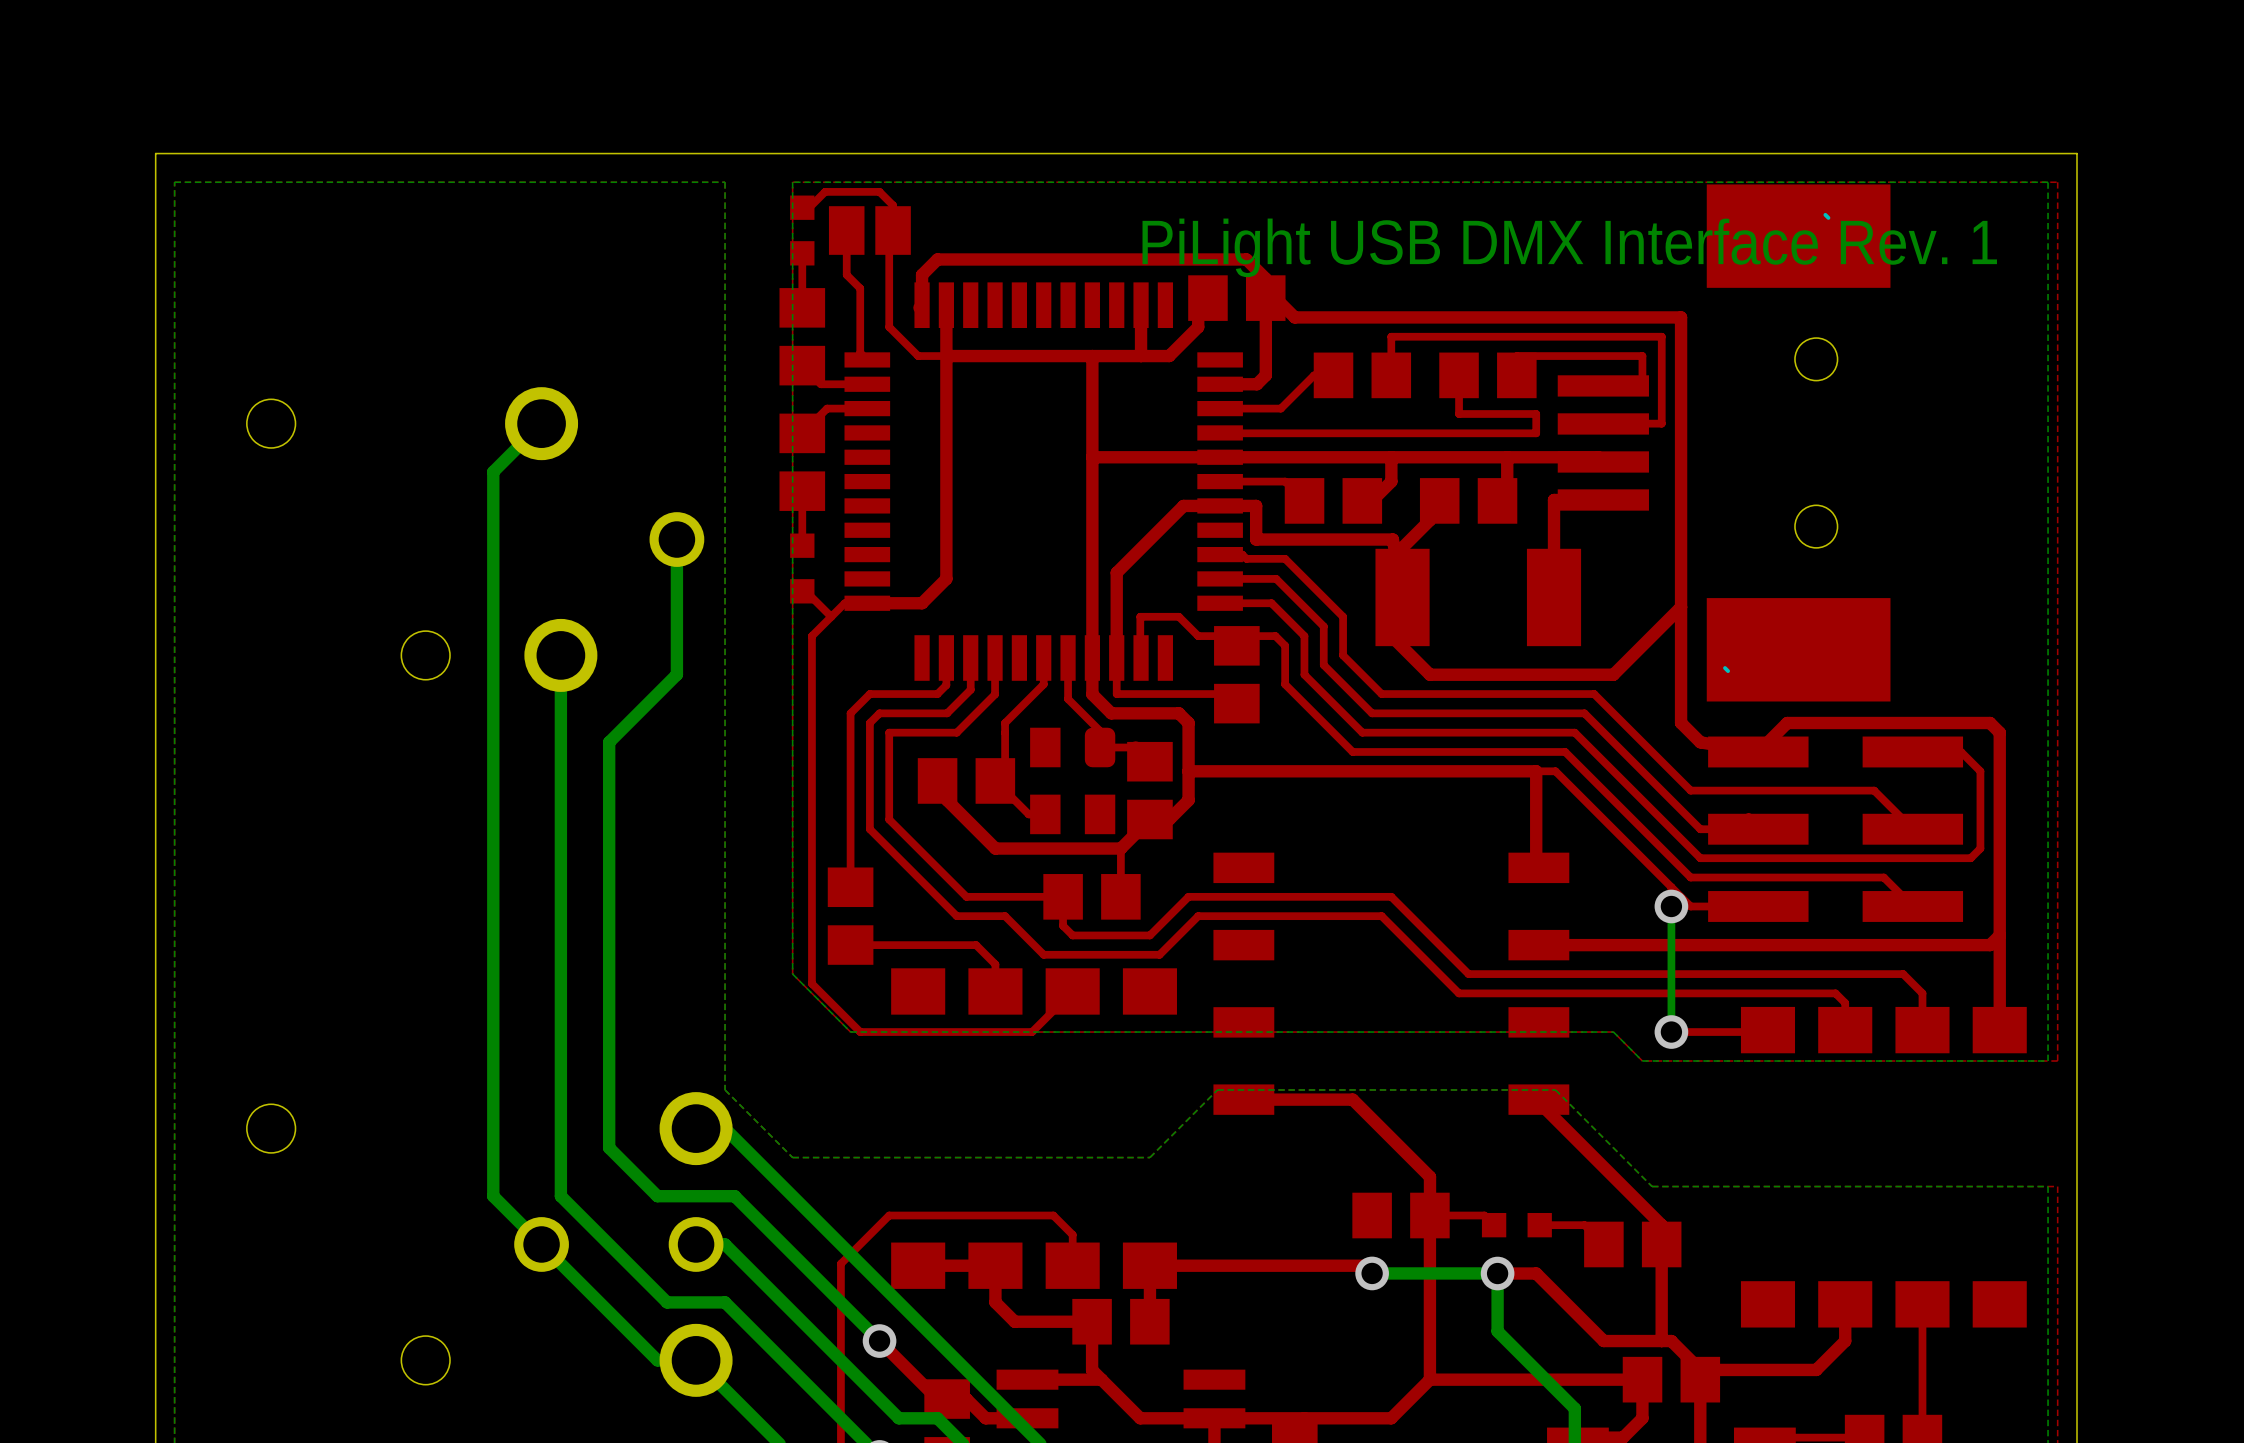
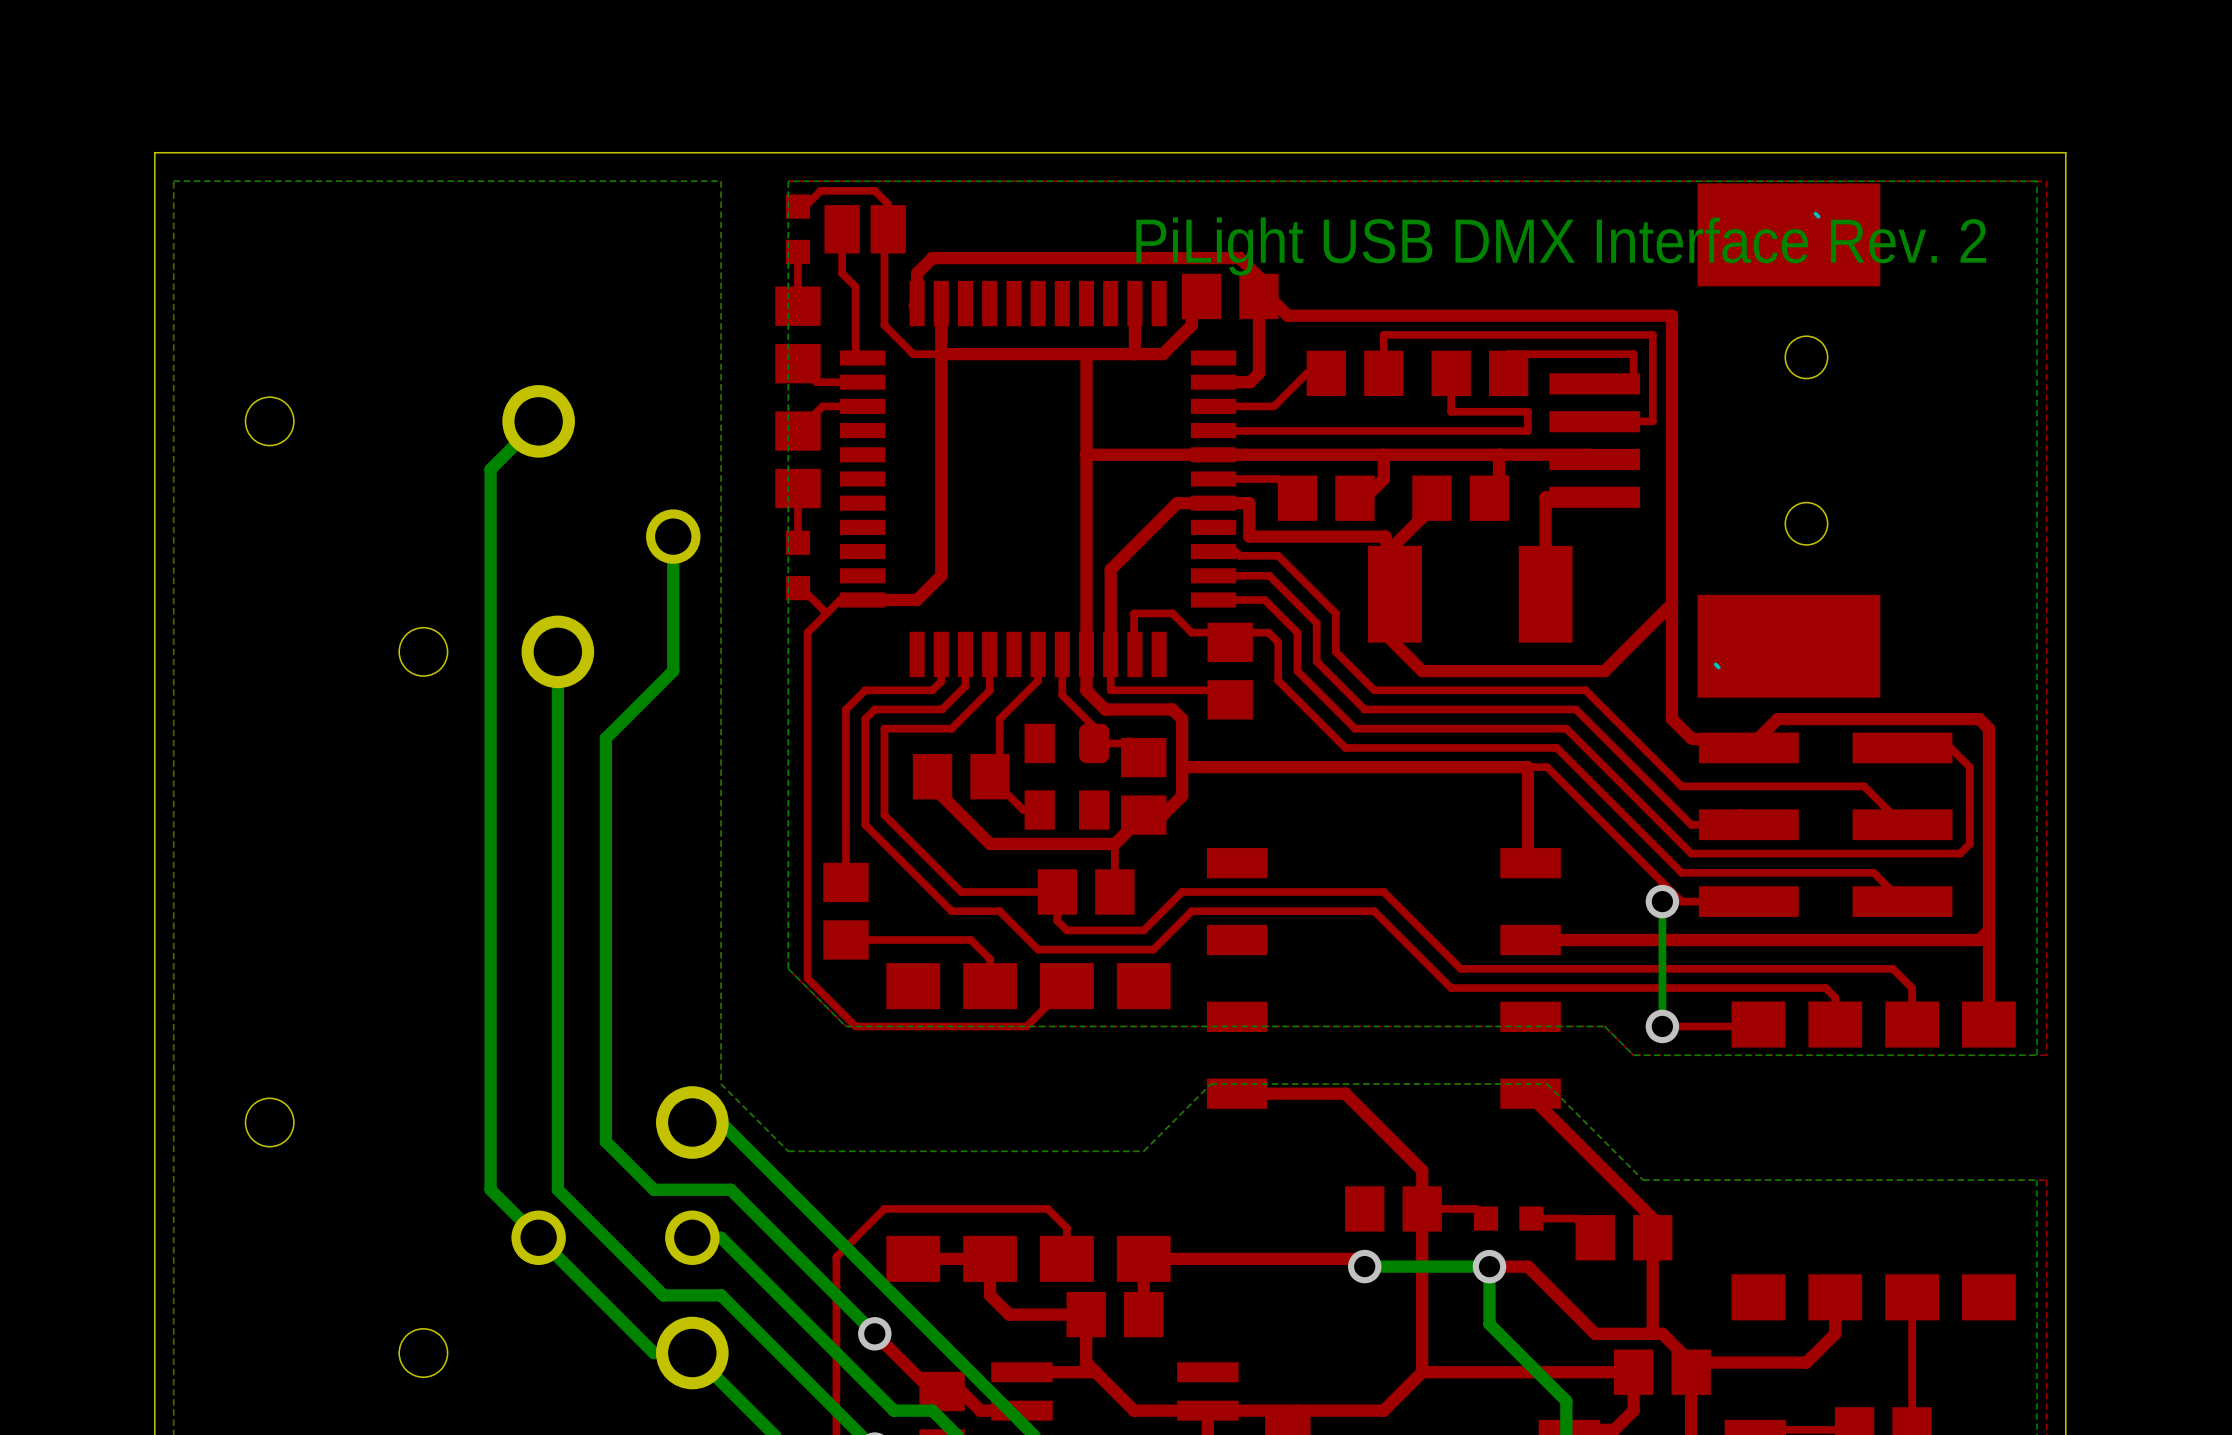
text: PiLight USB DMX Interface Rev. 1 (1569, 247) -> PiLight USB DMX Interface Rev. 2 (1561, 246)

